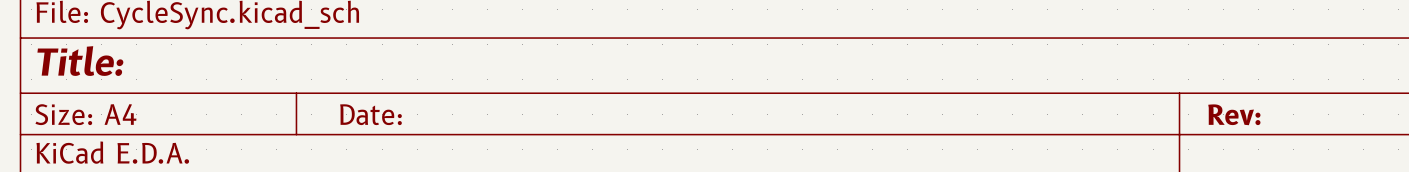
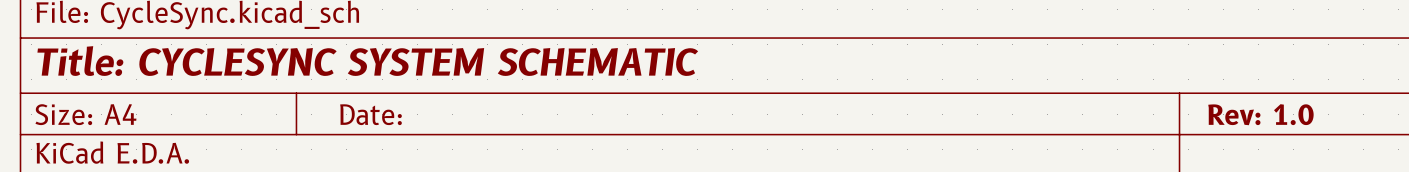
title block: Title: (80, 61) -> Title: CYCLESYNC SYSTEM SCHEMATIC (367, 61)
title block: Rev: (1234, 114) -> Rev: 1.0 (1260, 114)

